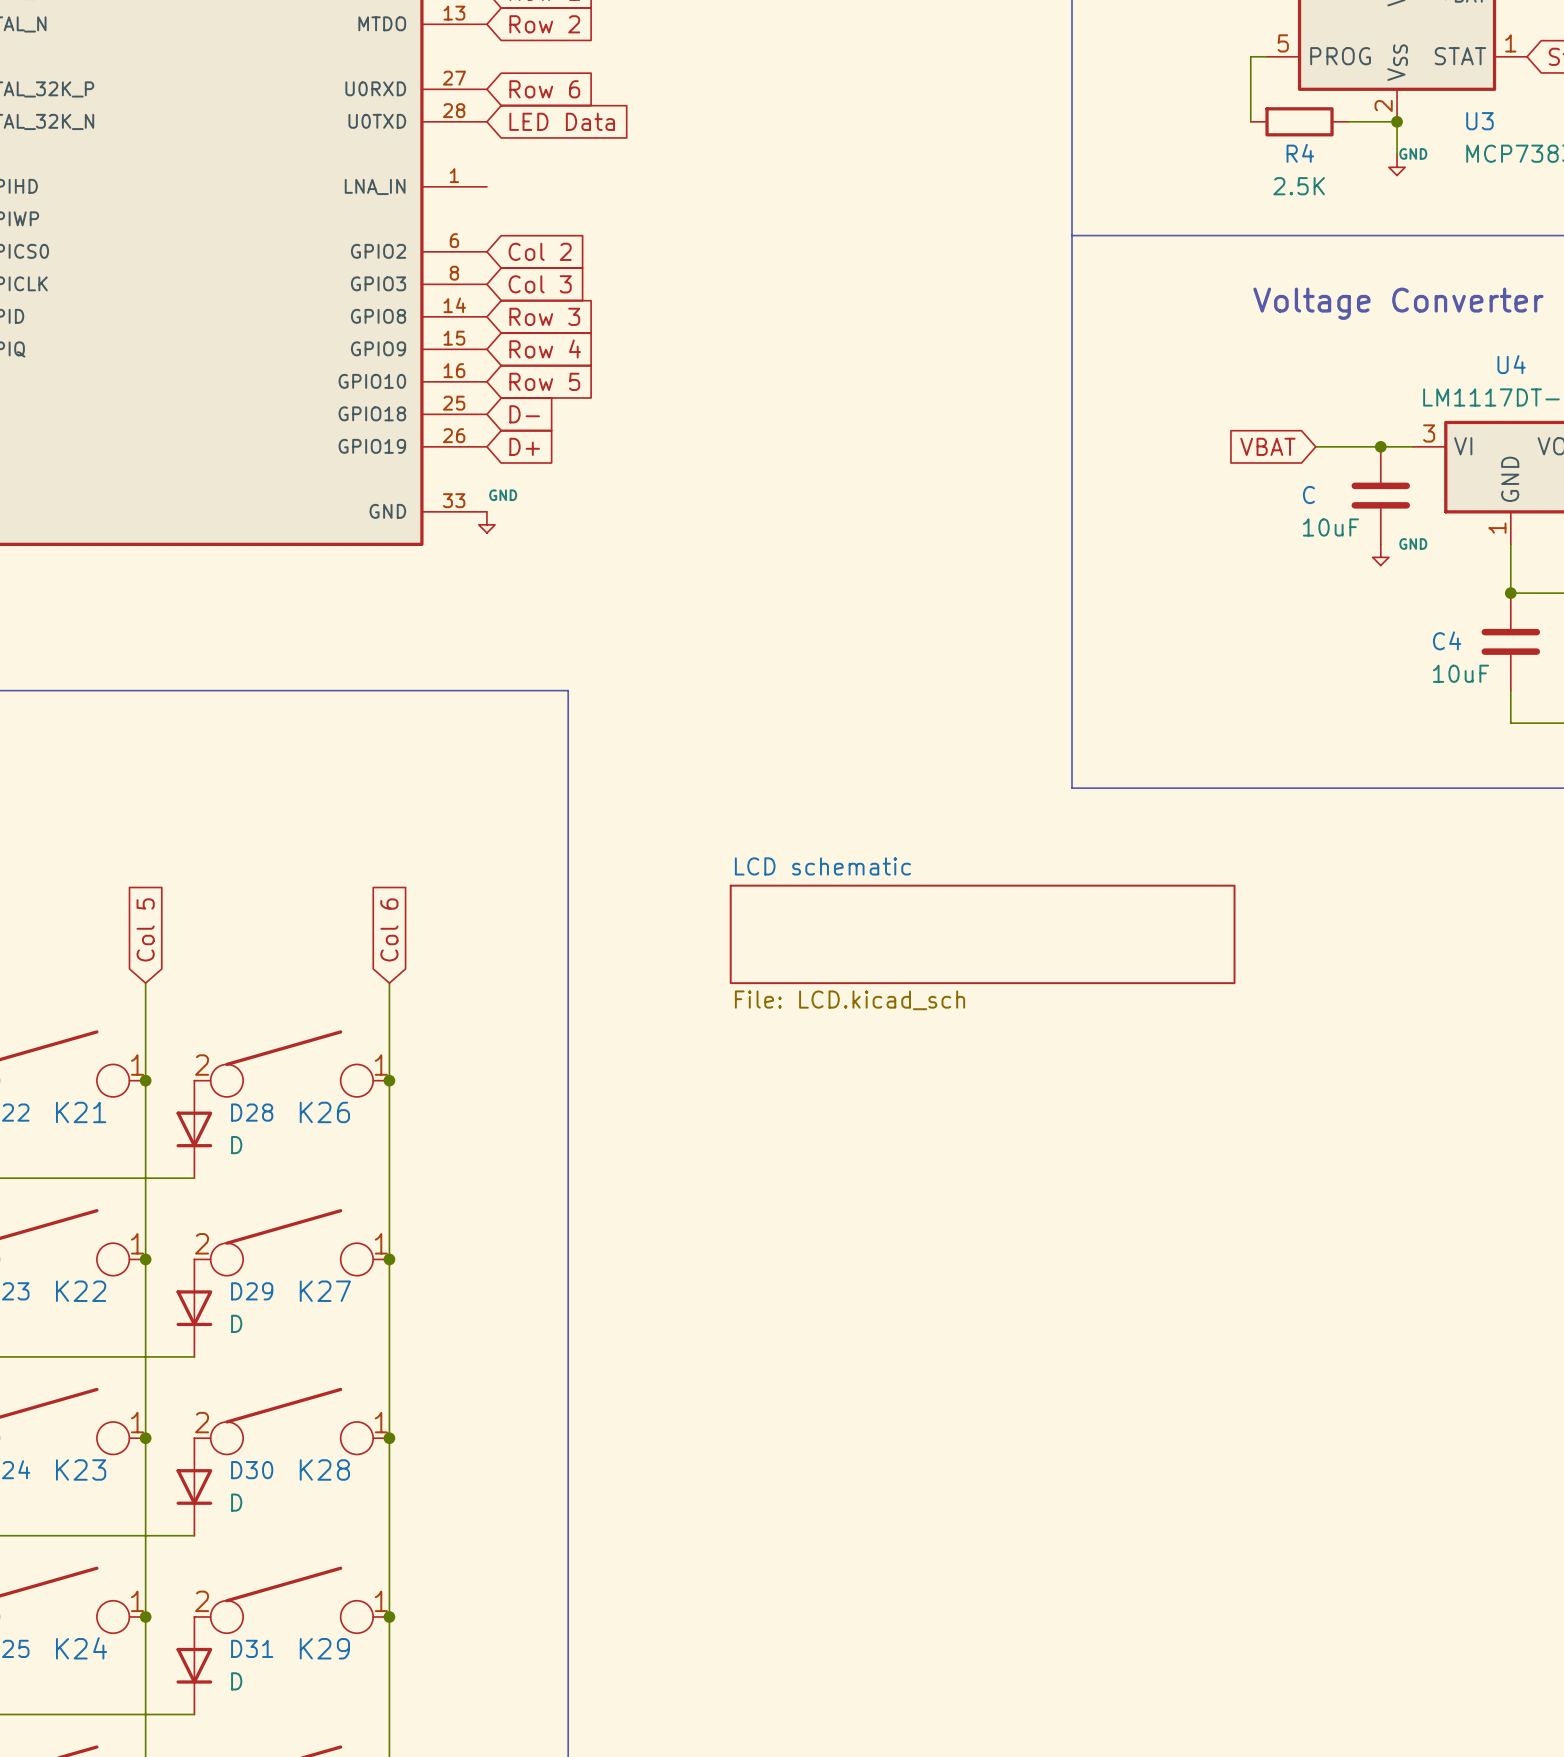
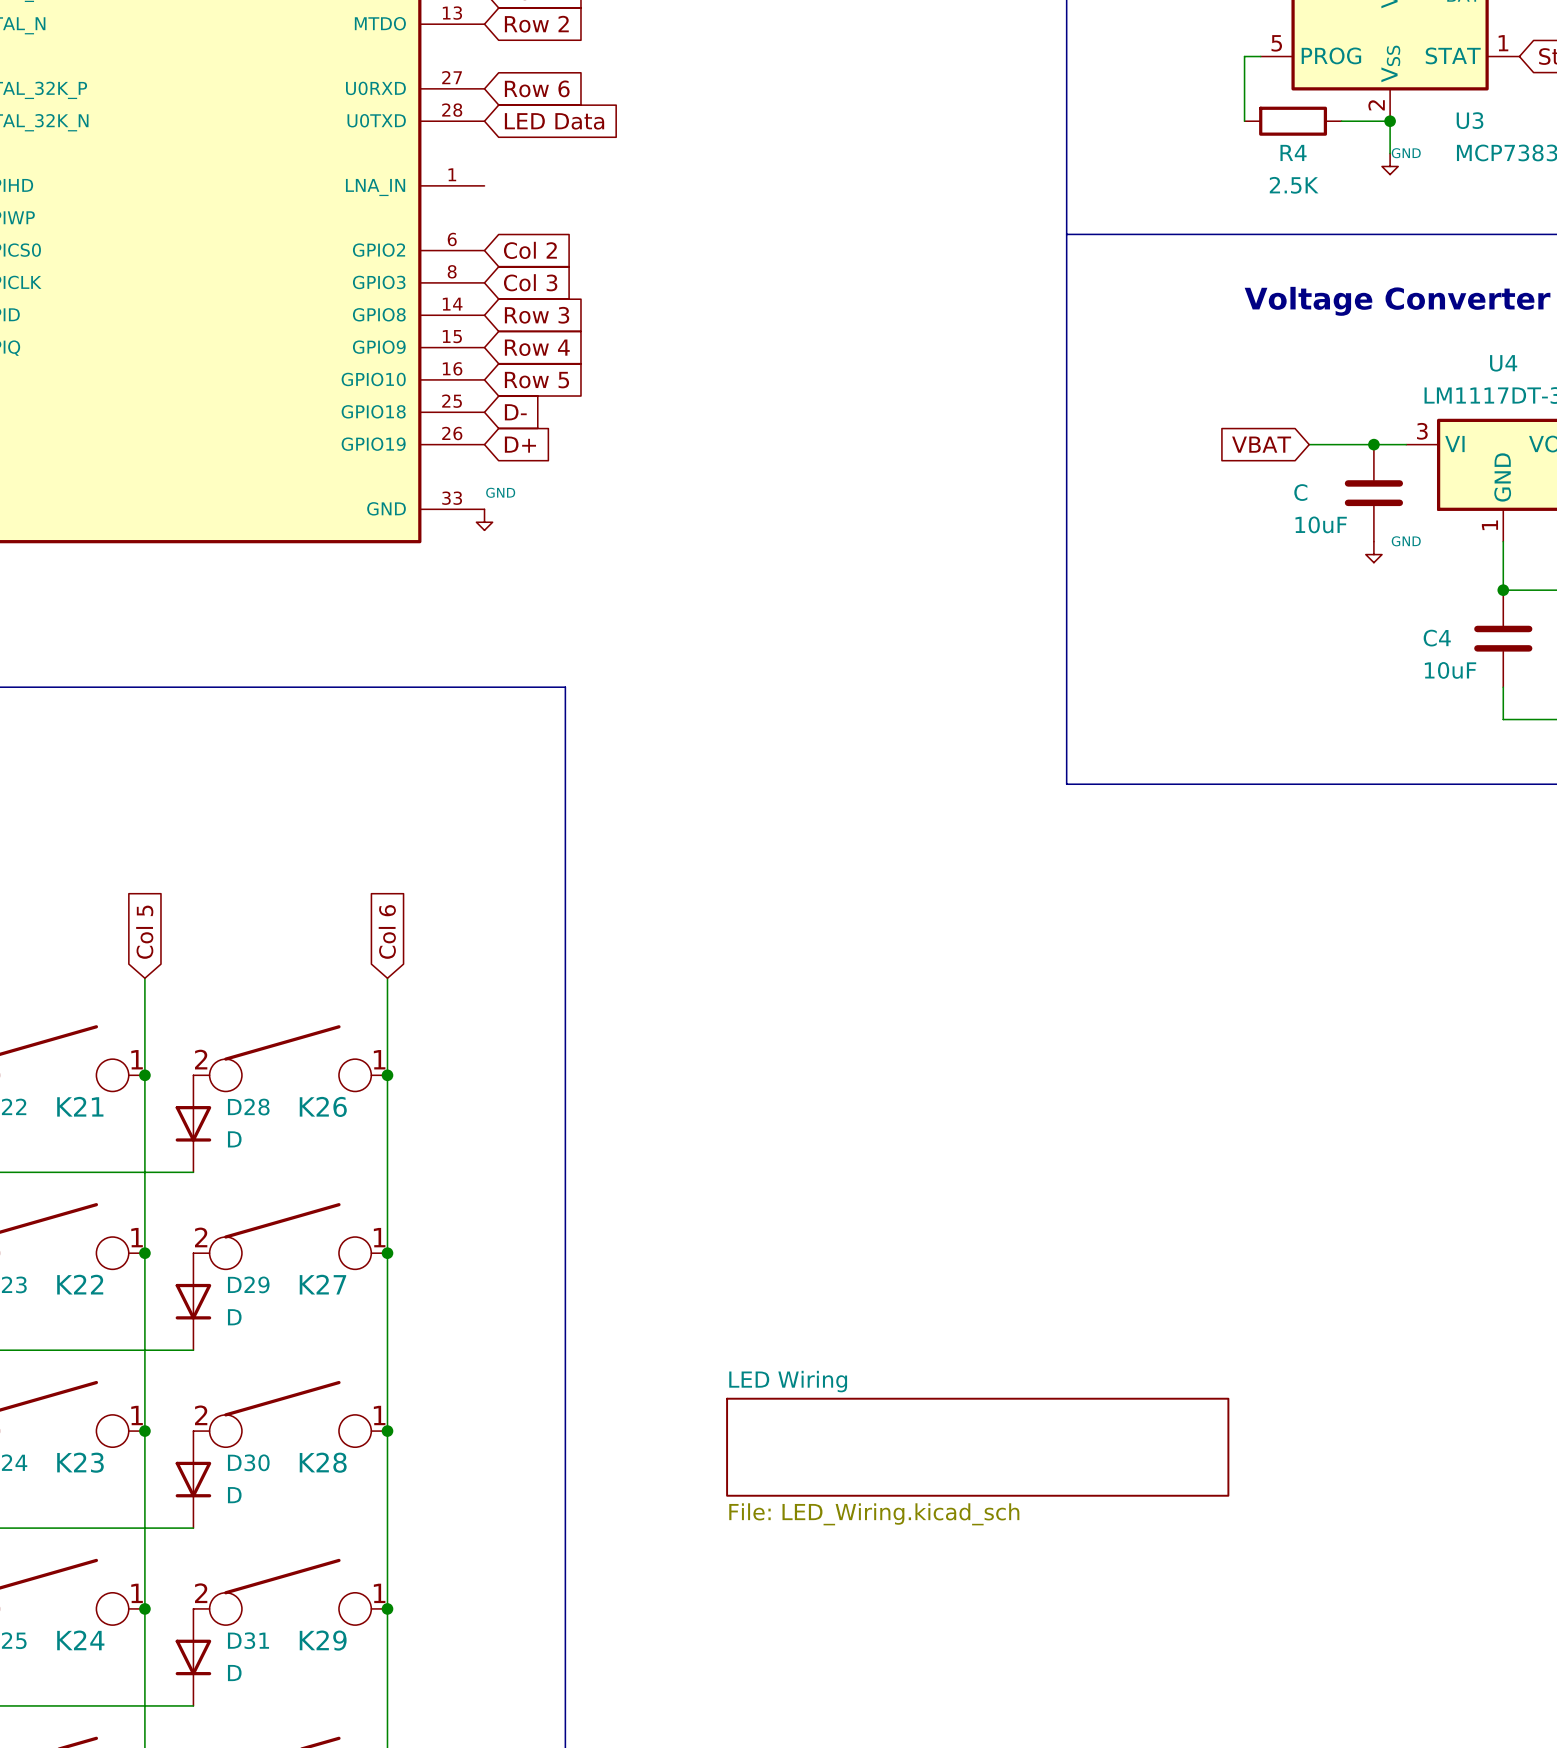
sheet LCD schematic: File: LCD.kicad_sch (982, 934) -> none
sheet LED Wiring: none -> File: LED_Wiring.kicad_sch (977, 1447)

